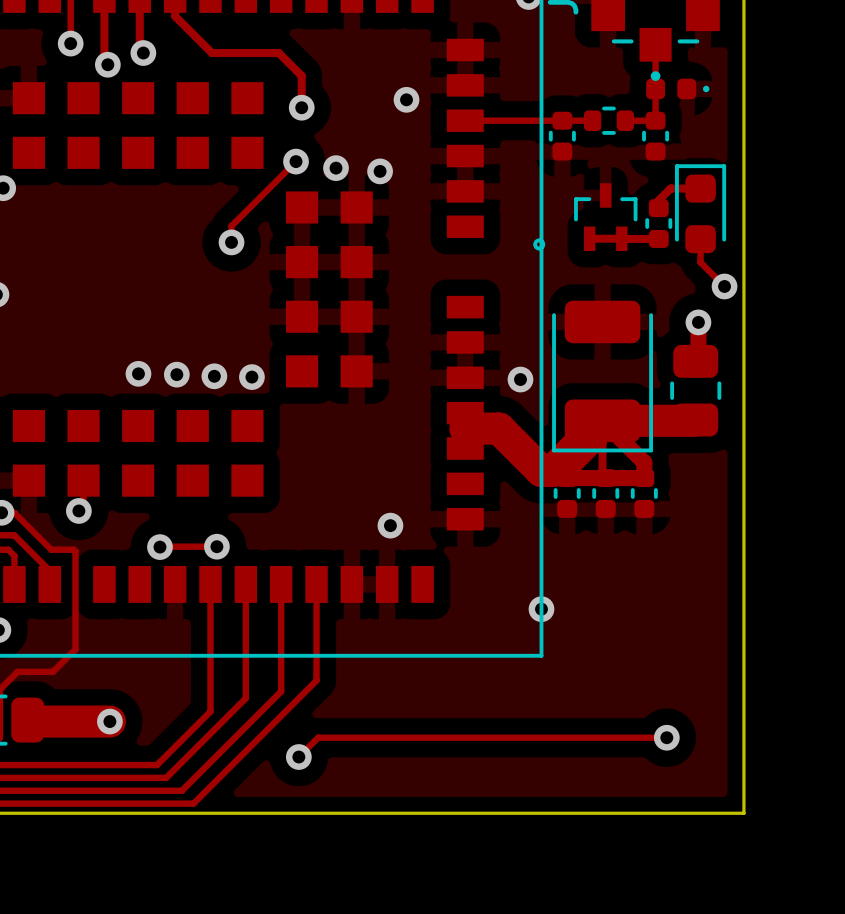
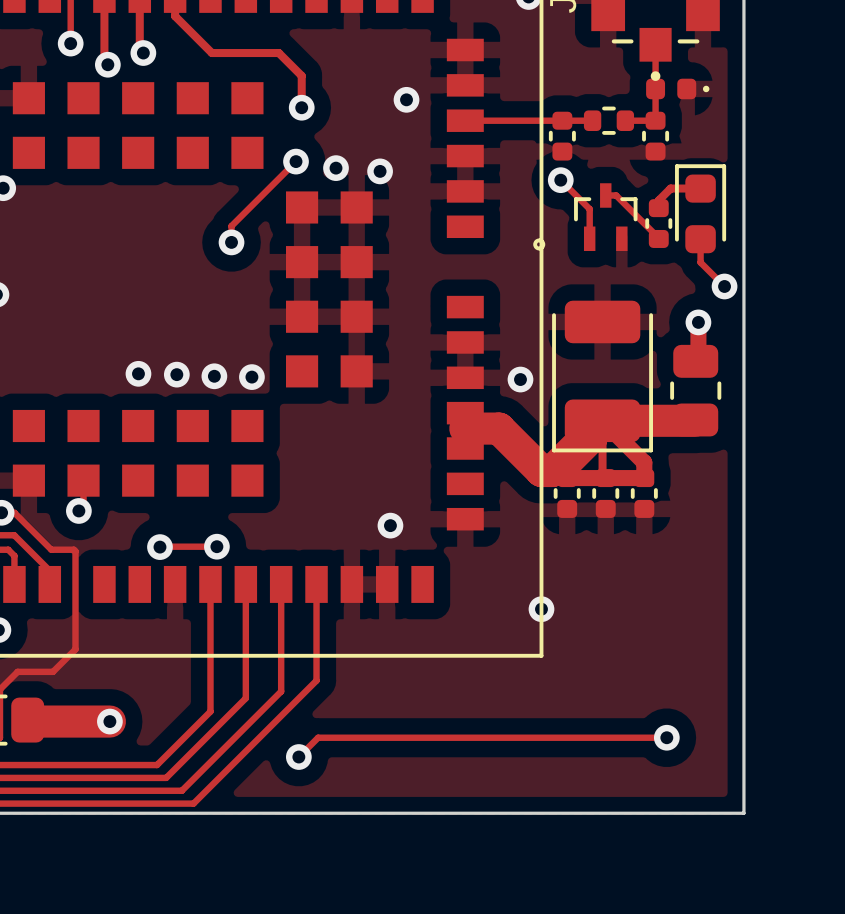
via: none -> (560, 180)
track: (589, 238) (621, 238) -> (589, 238) (589, 209) (560, 180)
track: (622, 238) (658, 238) -> (605, 195) (616, 195) (658, 238)

